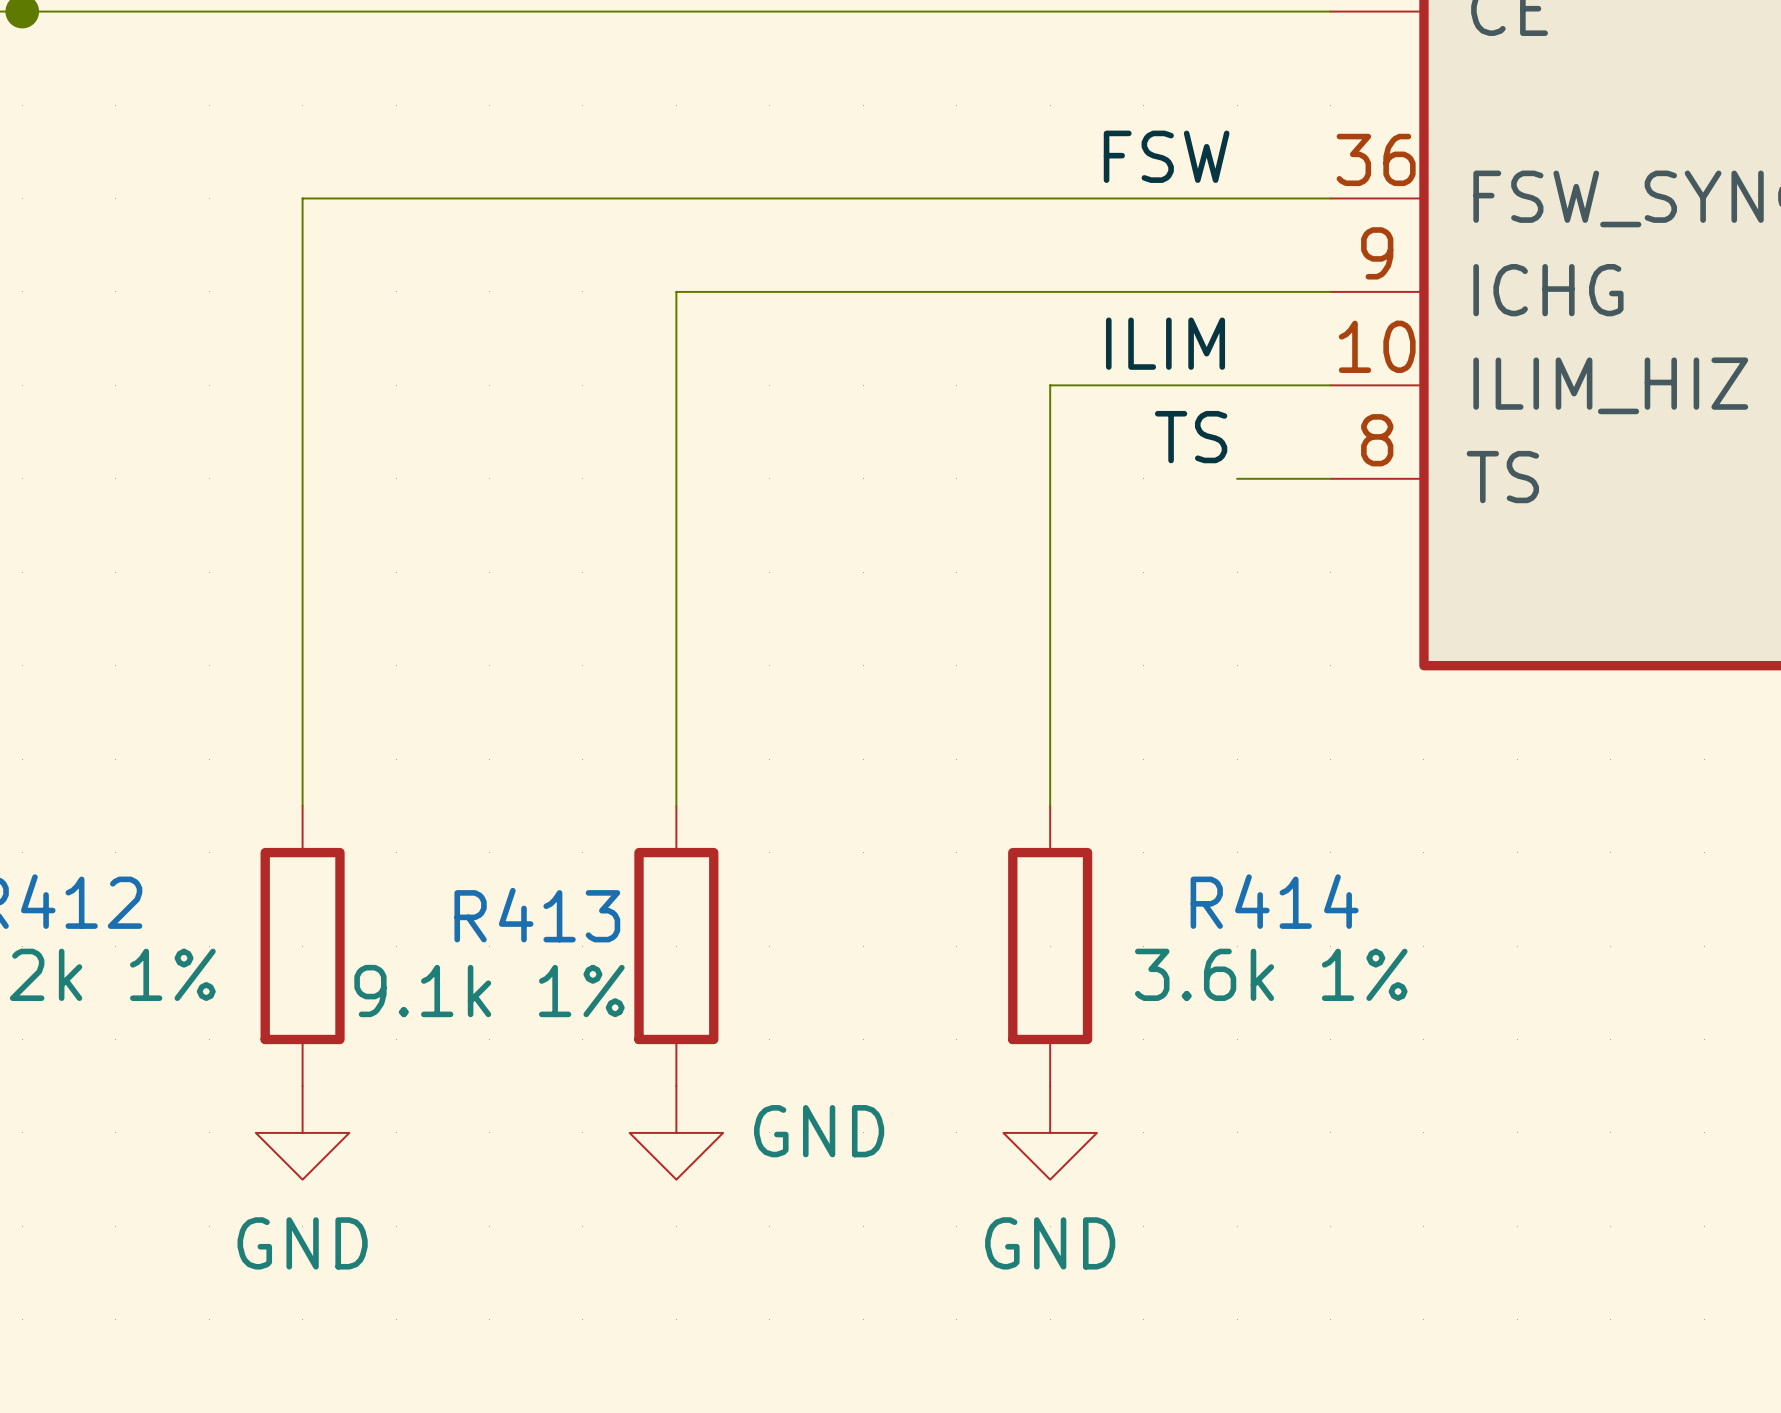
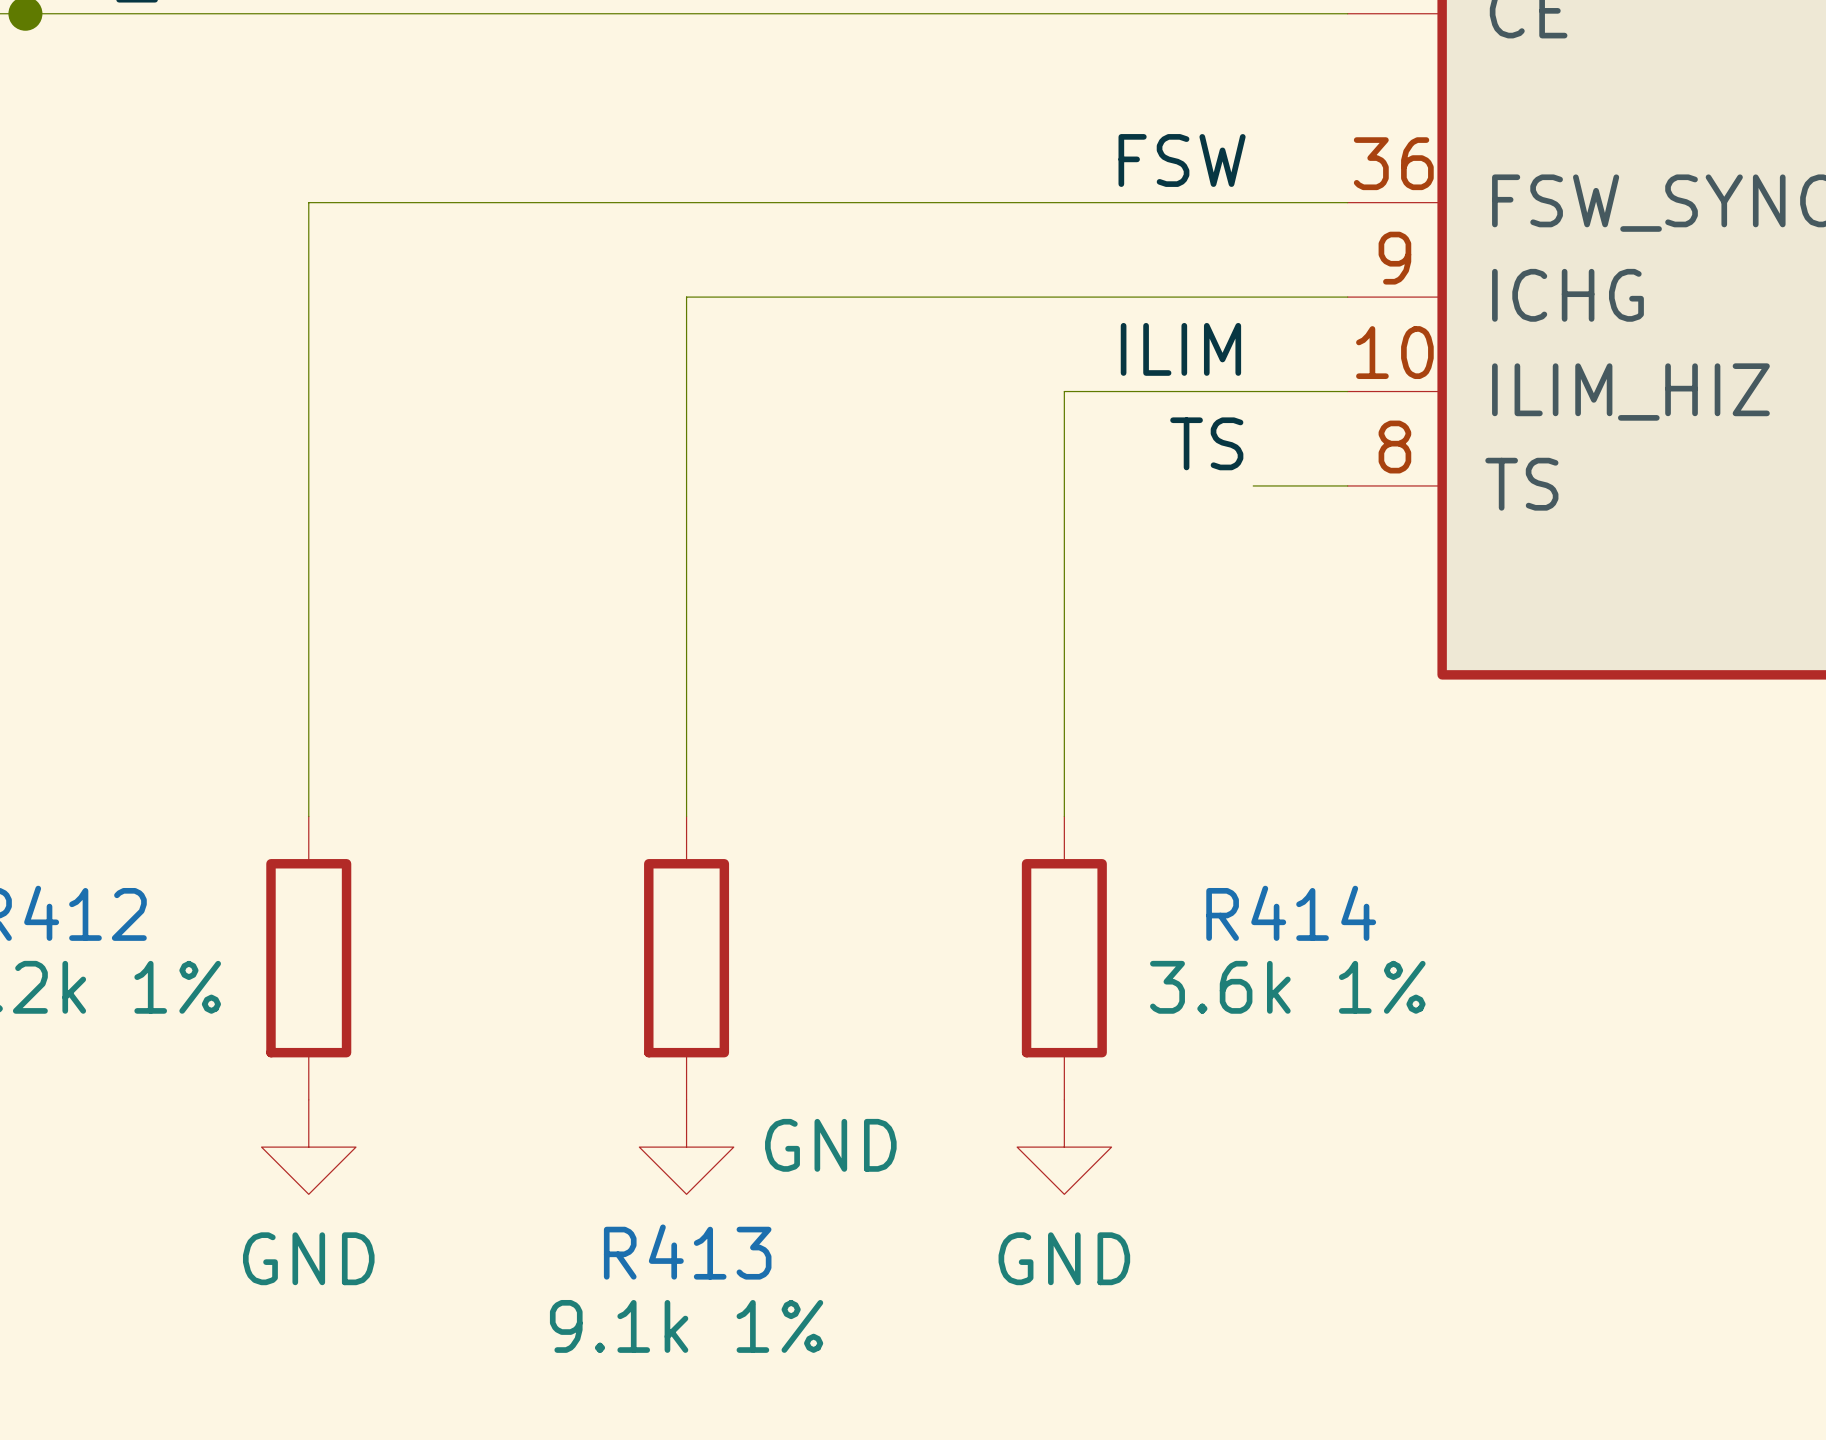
R413 name position: R413 (537, 915) -> R413 (687, 1252)
R413 value position: 9.1k 1% (489, 991) -> 9.1k 1% (686, 1326)

